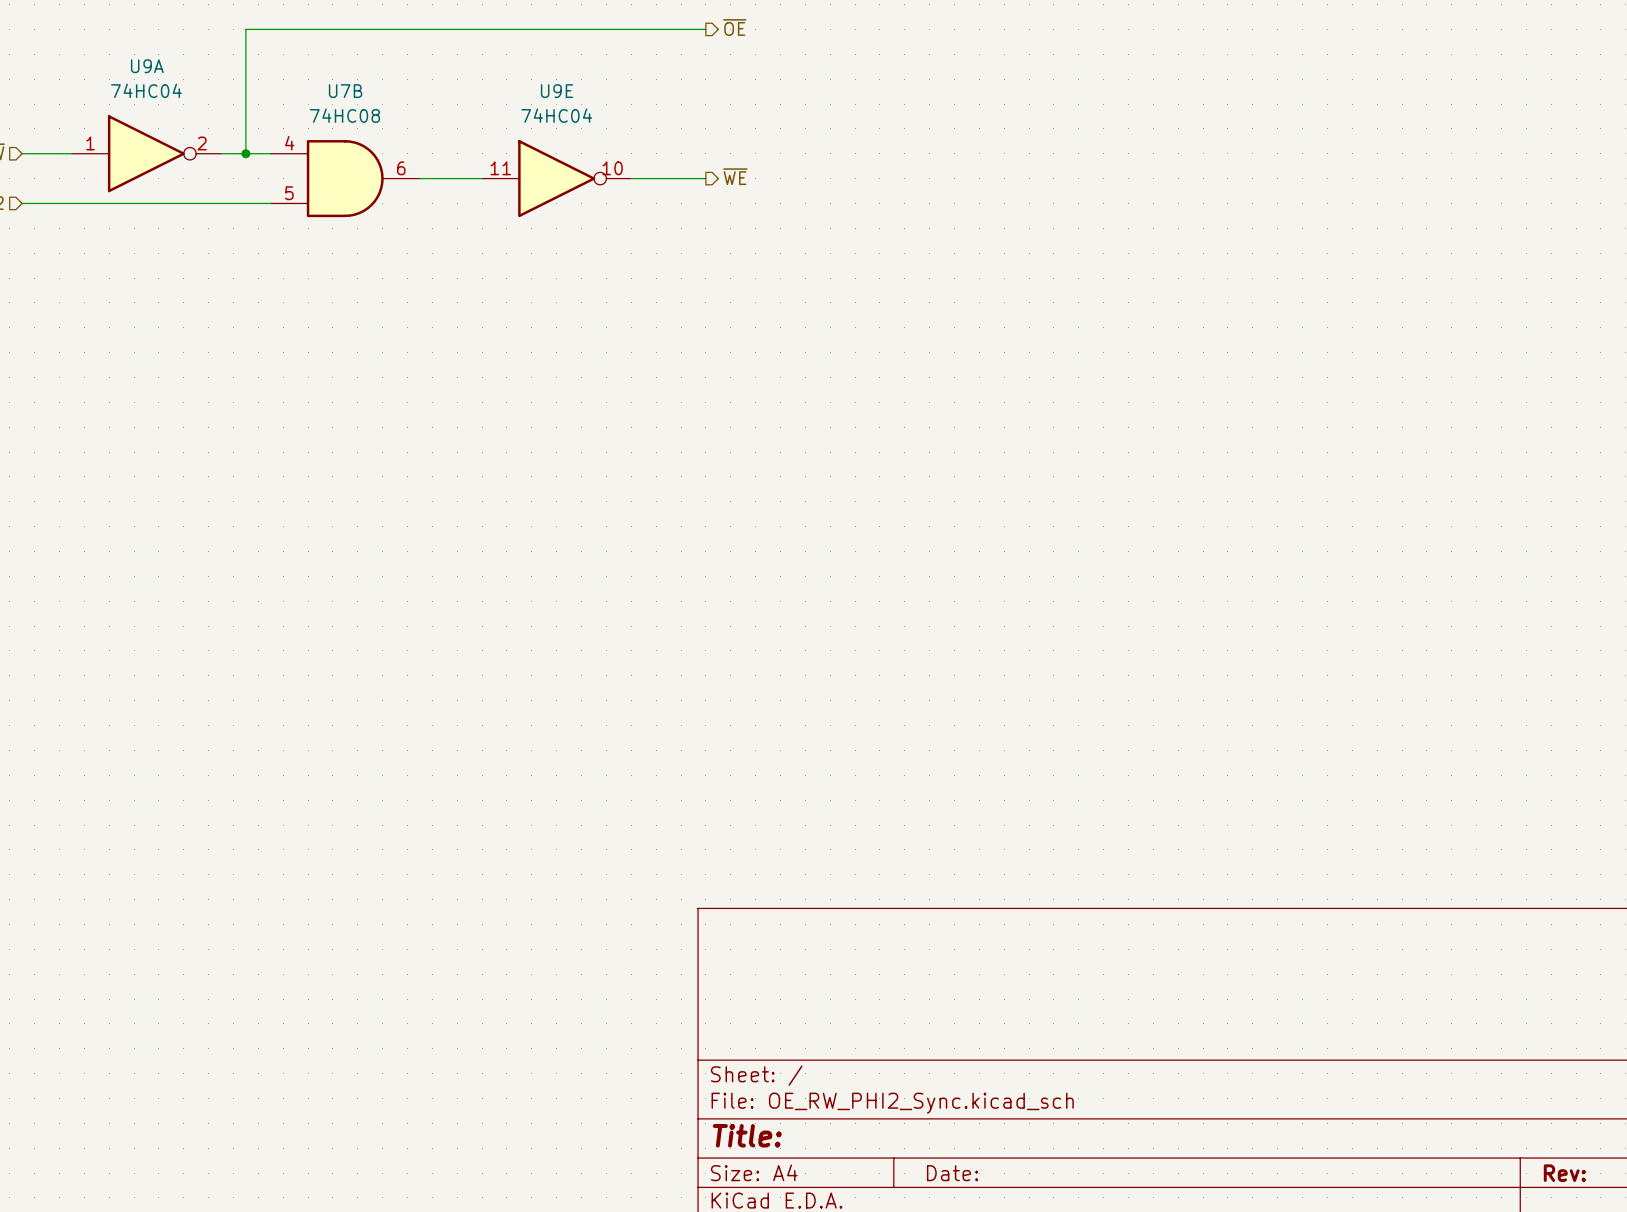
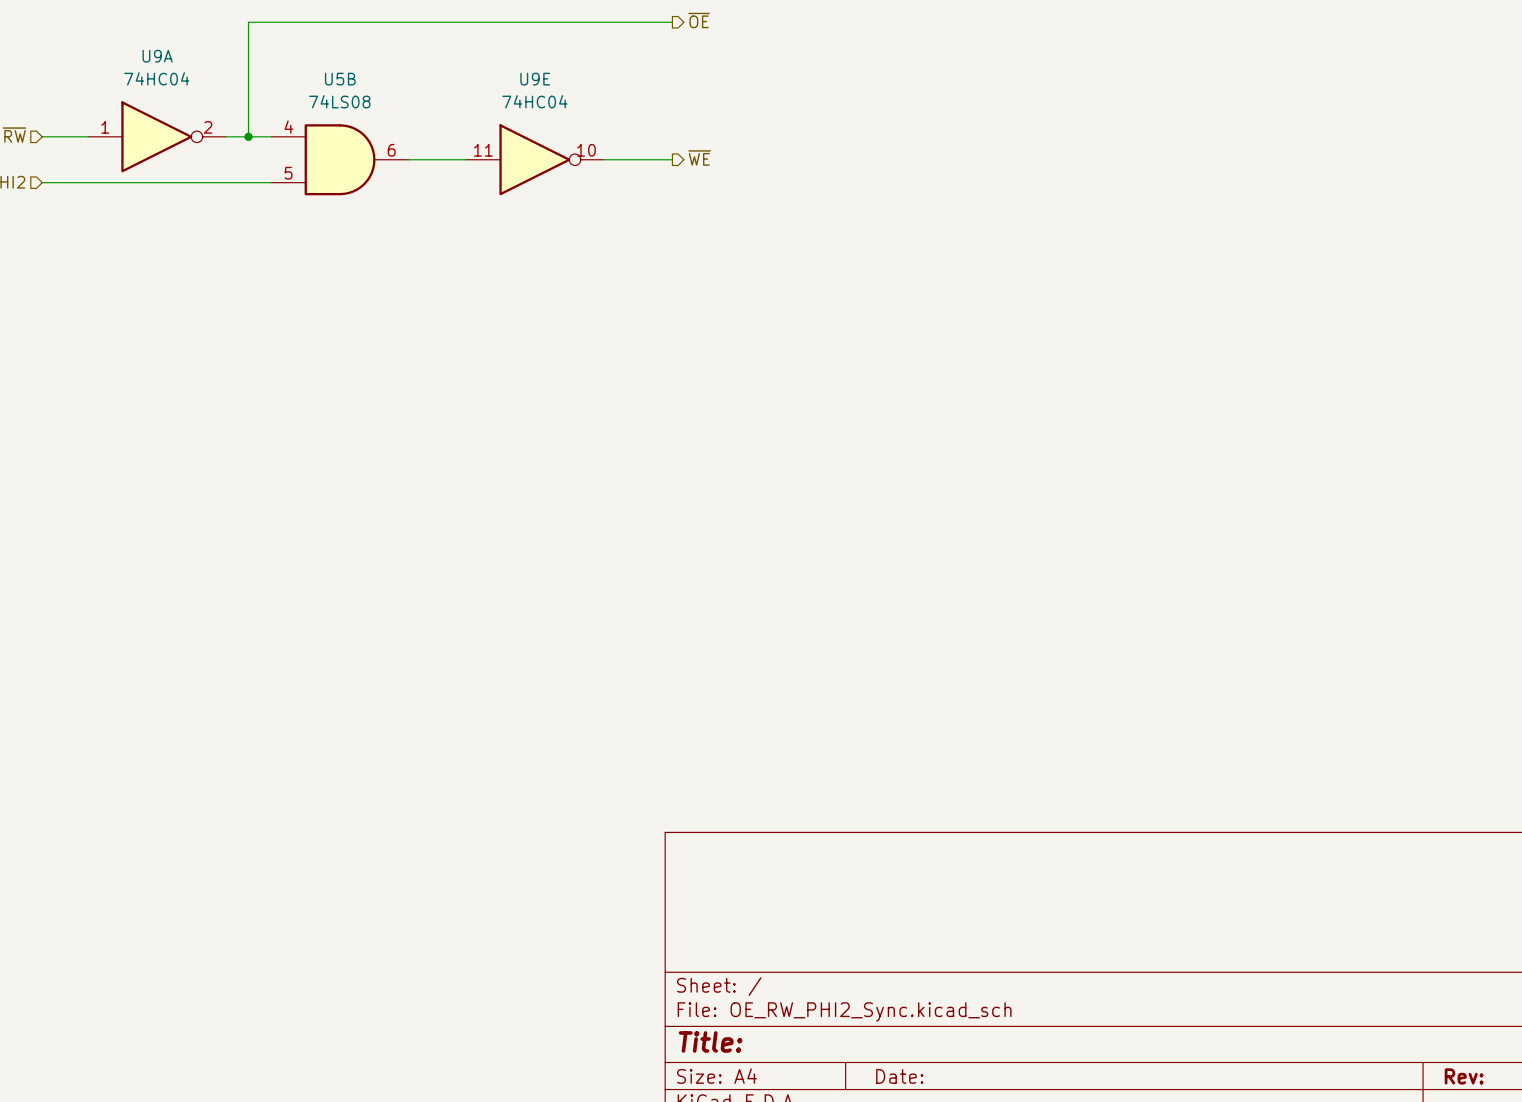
U7B name: U7B (345, 91) -> U5B (340, 79)
U7B value: 74HC08 (344, 115) -> 74LS08 (339, 101)

